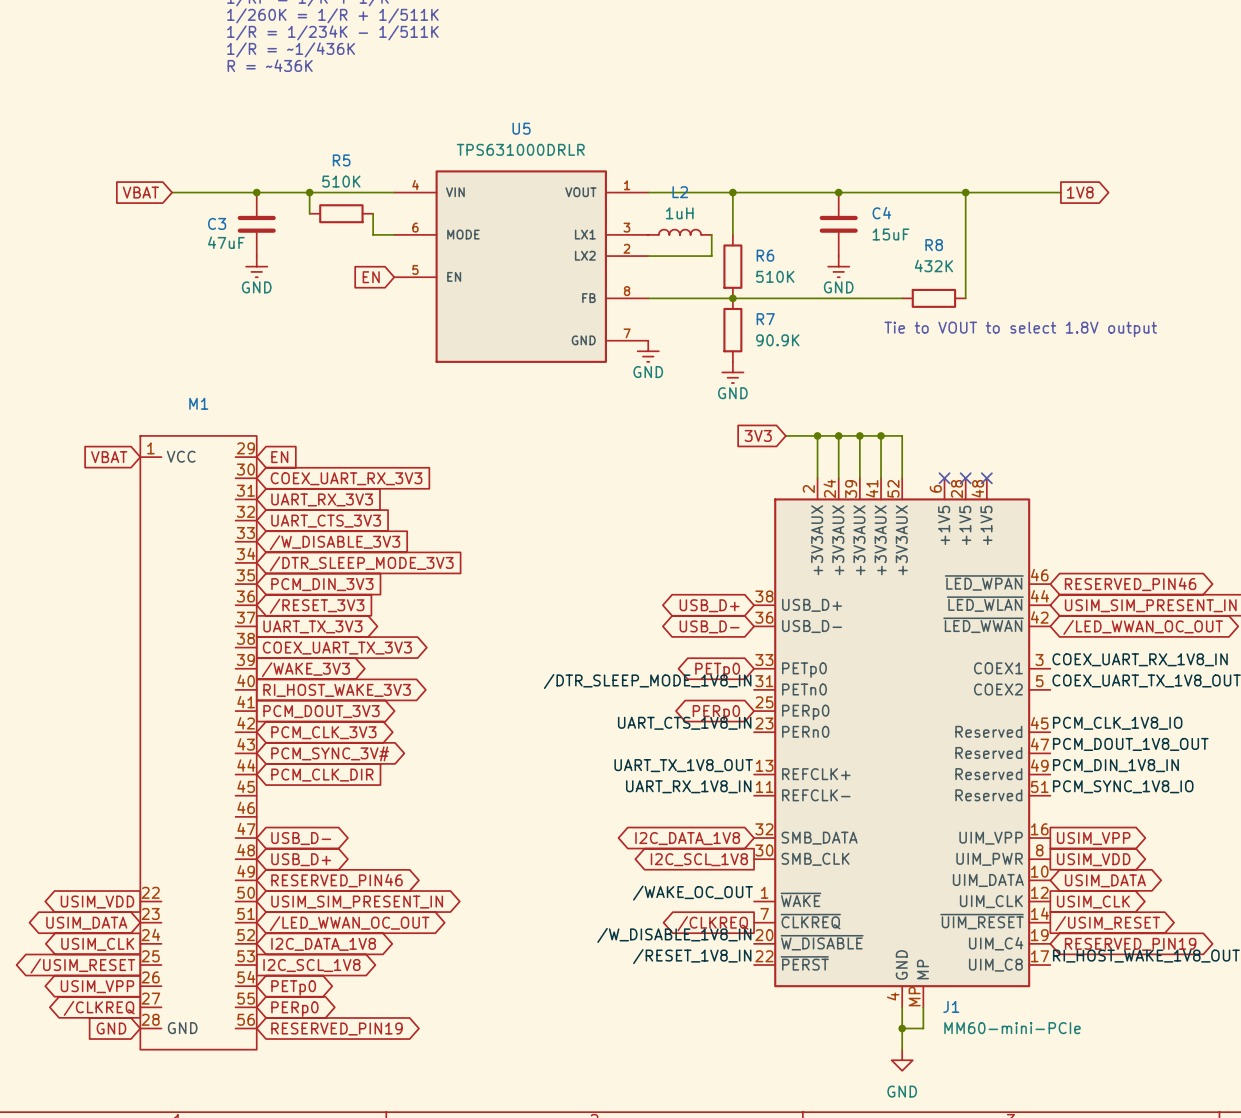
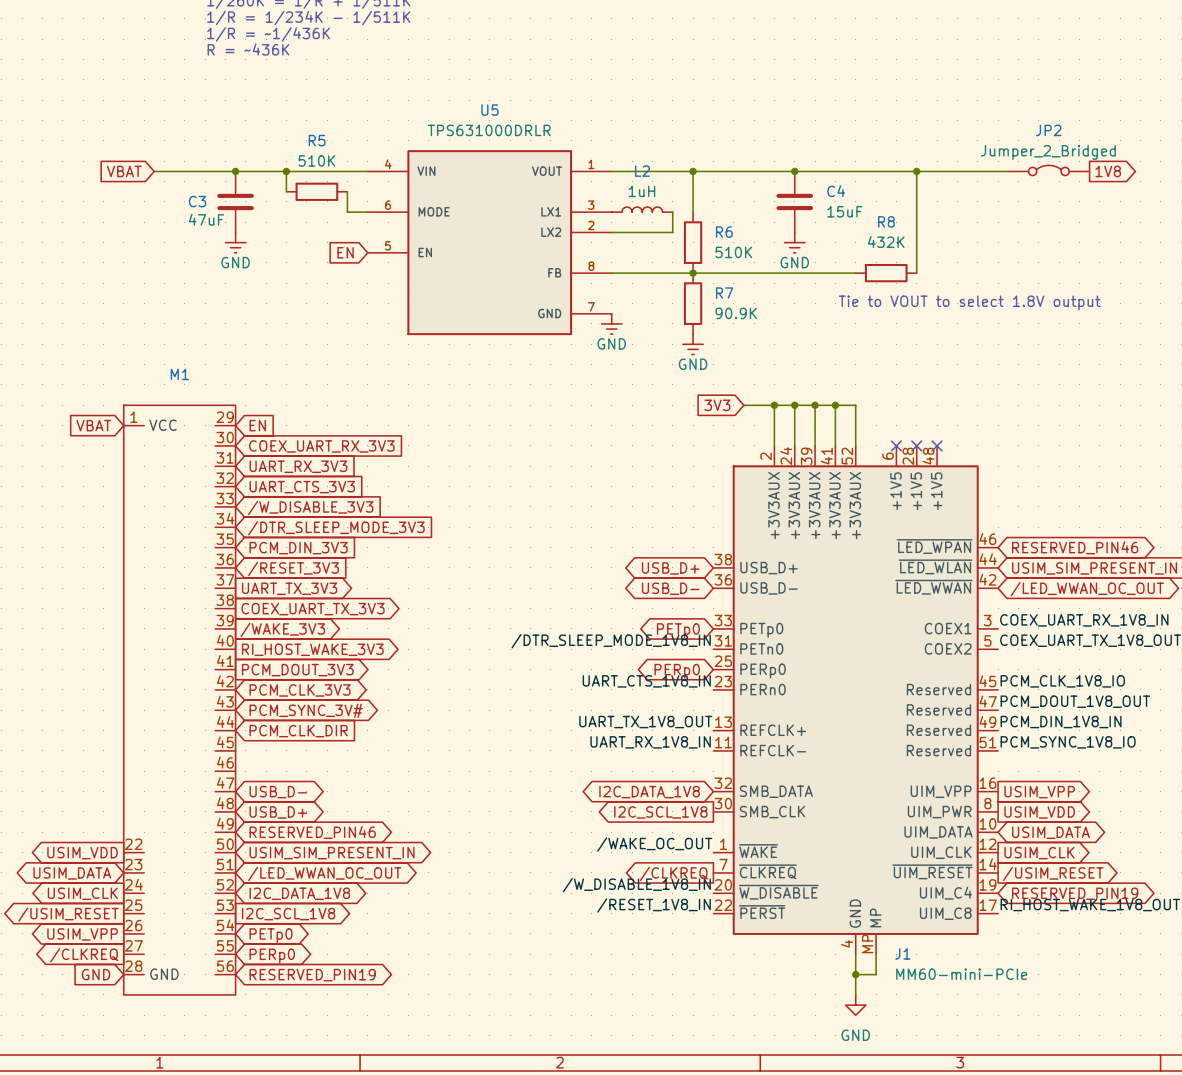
JP2: none -> Jumper_2_Bridged (1048, 170)
global label position: 1V8 (1080, 192) -> 1V8 (1108, 171)

